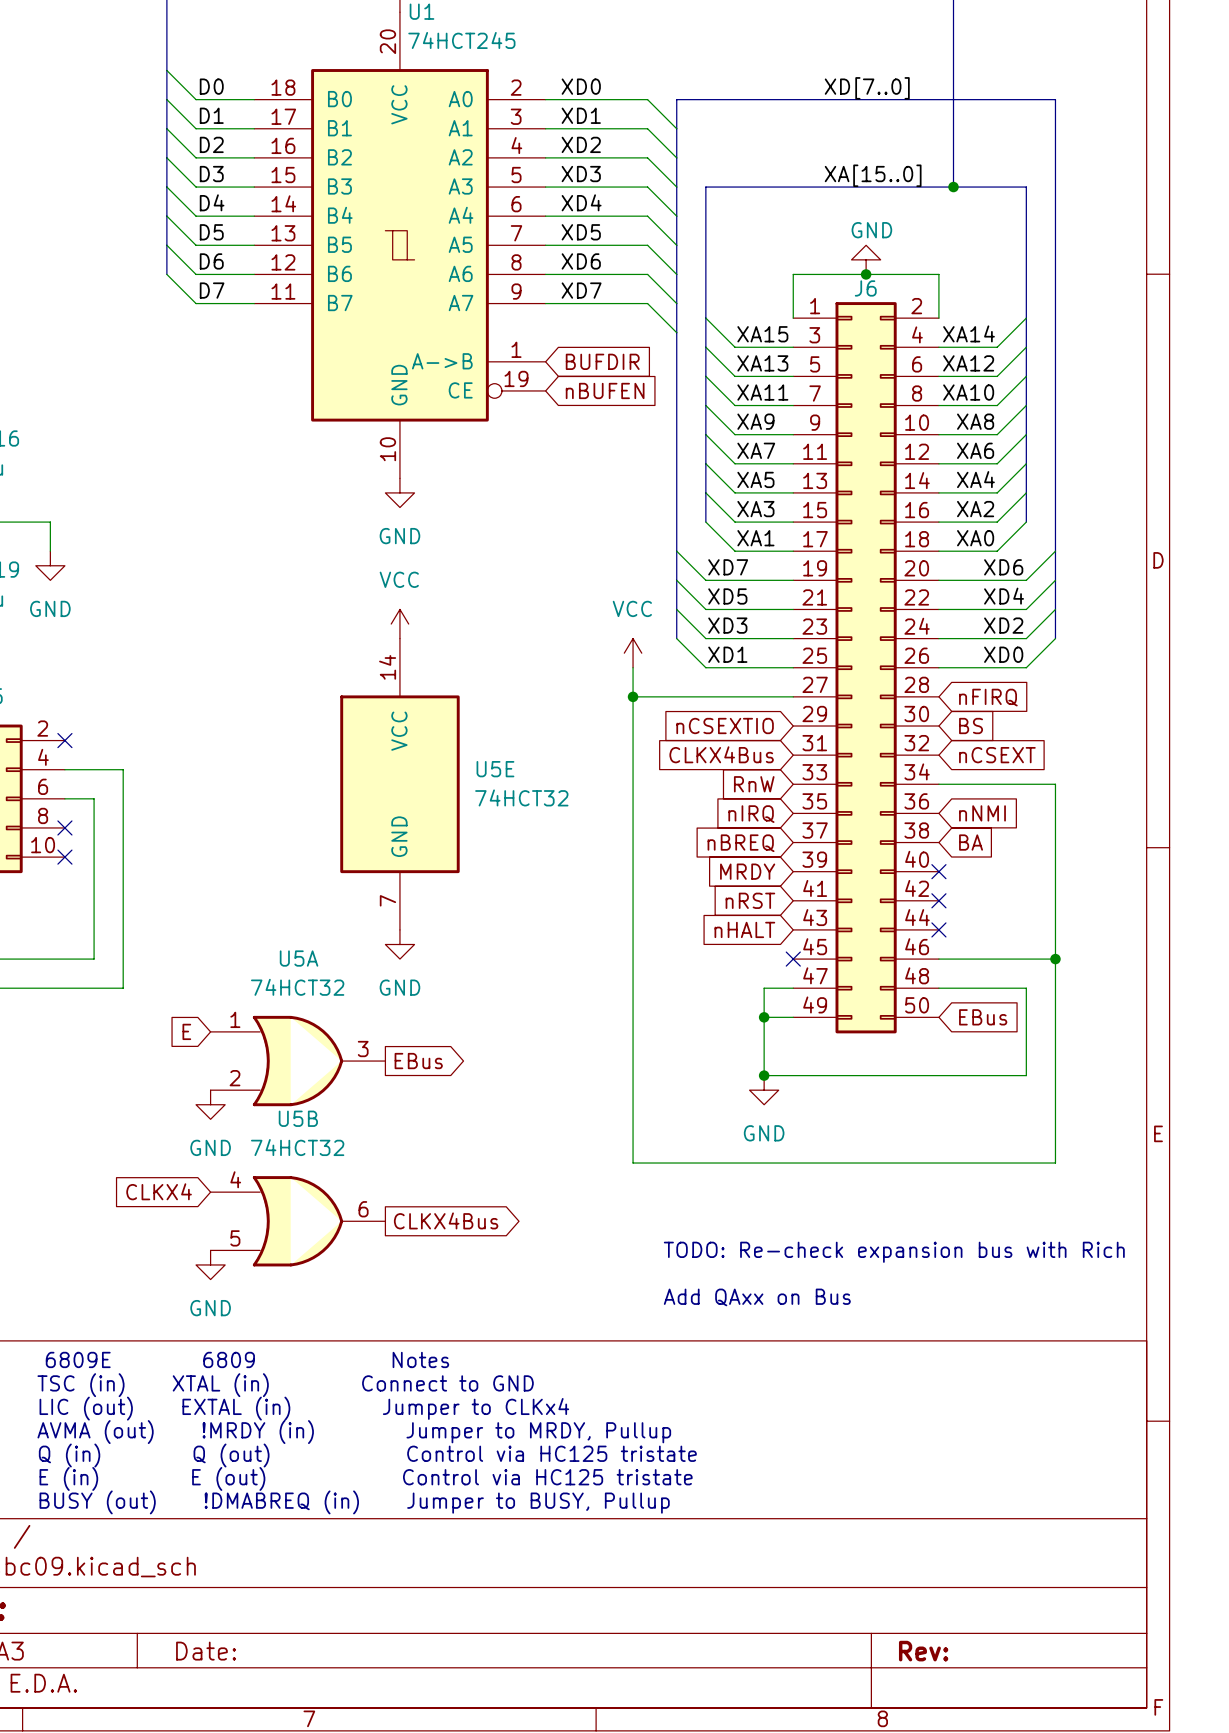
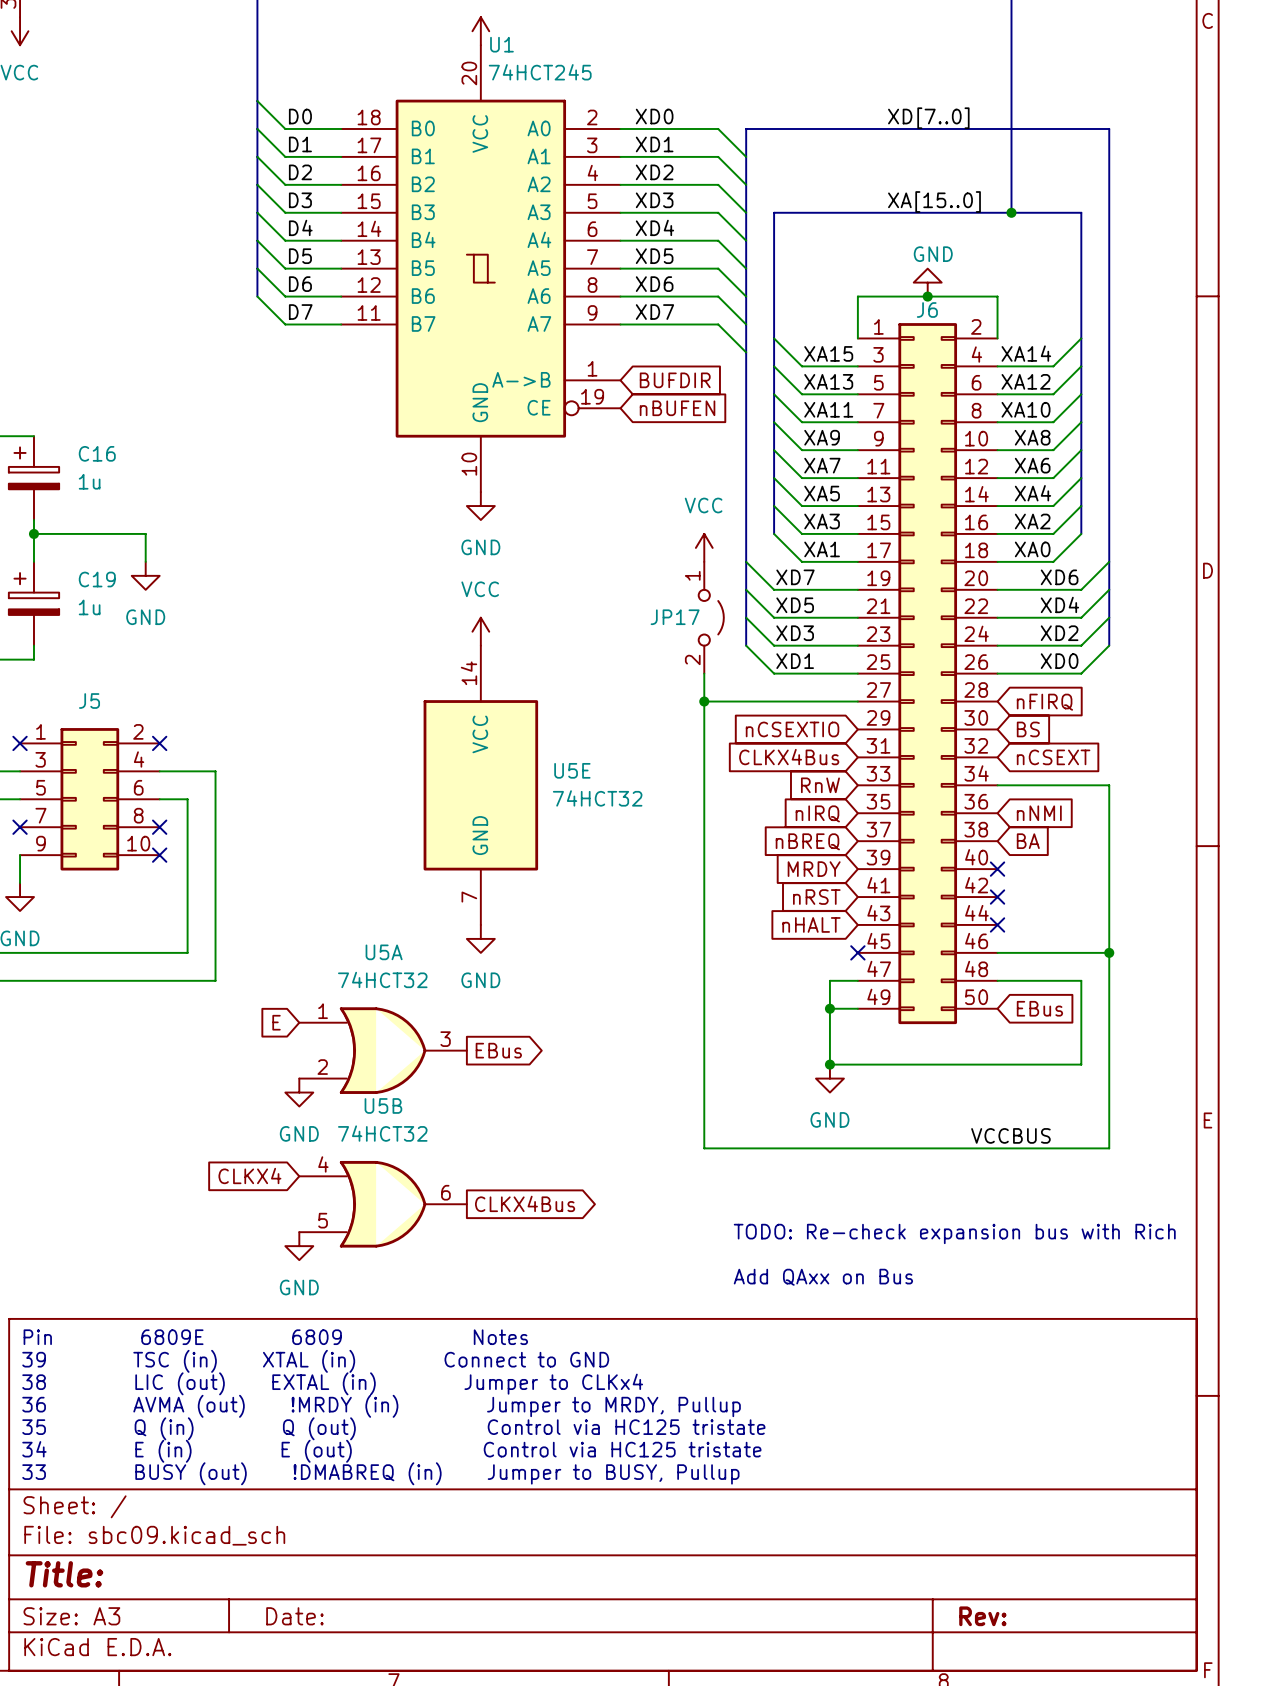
JP17: none -> (711, 617)
power symbol position: VCC (633, 653) -> VCC (704, 547)
label: none -> VCCBUS (1010, 1135)

